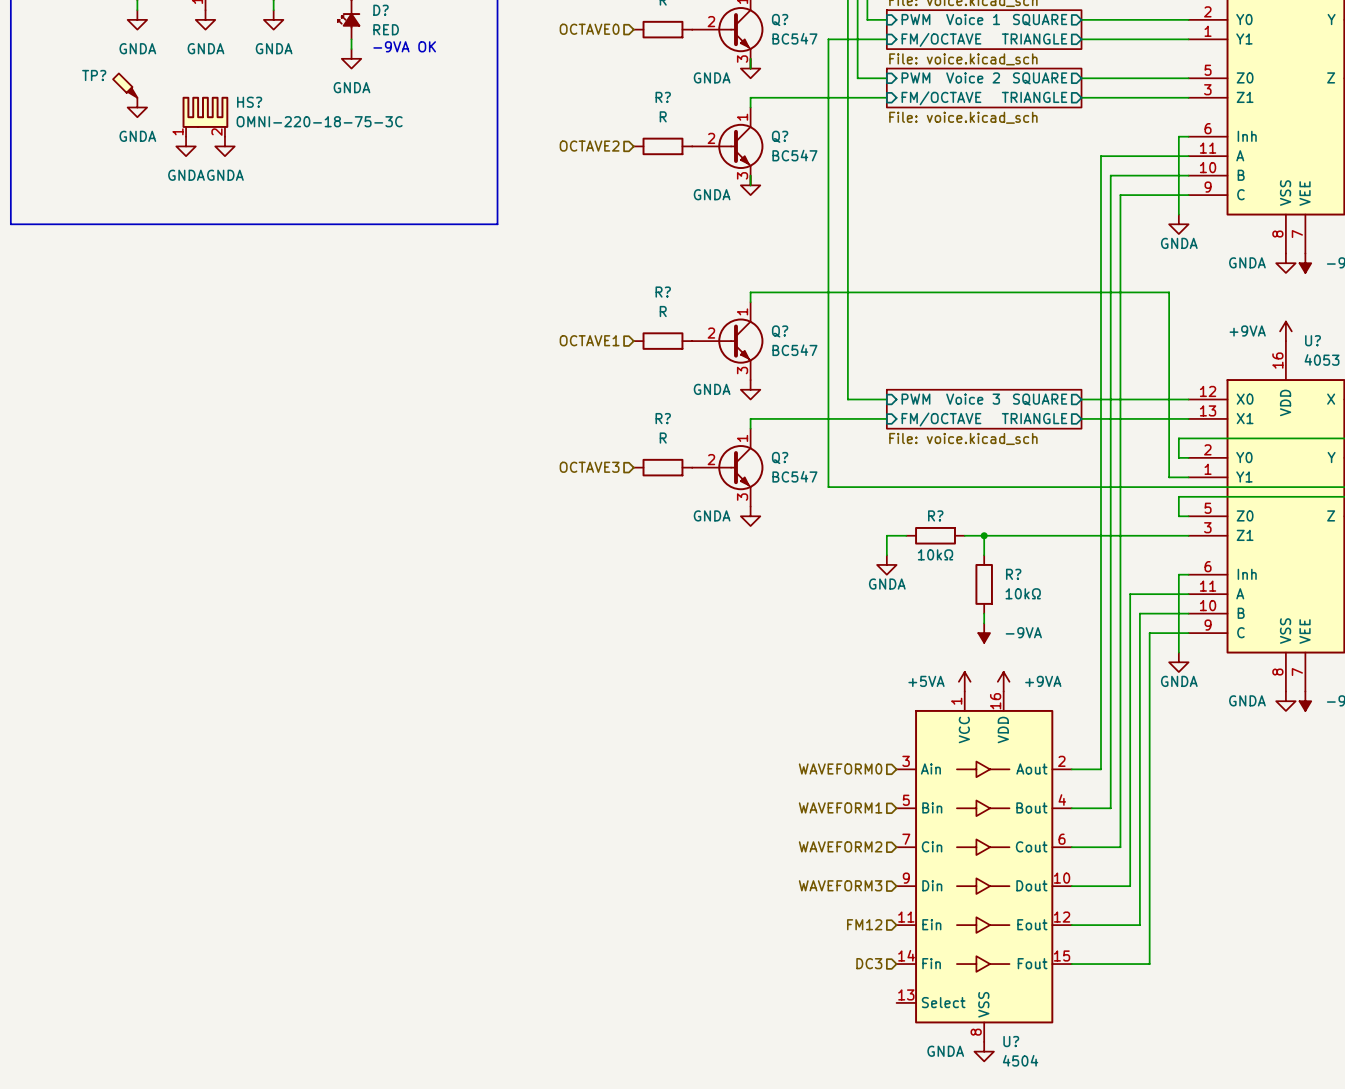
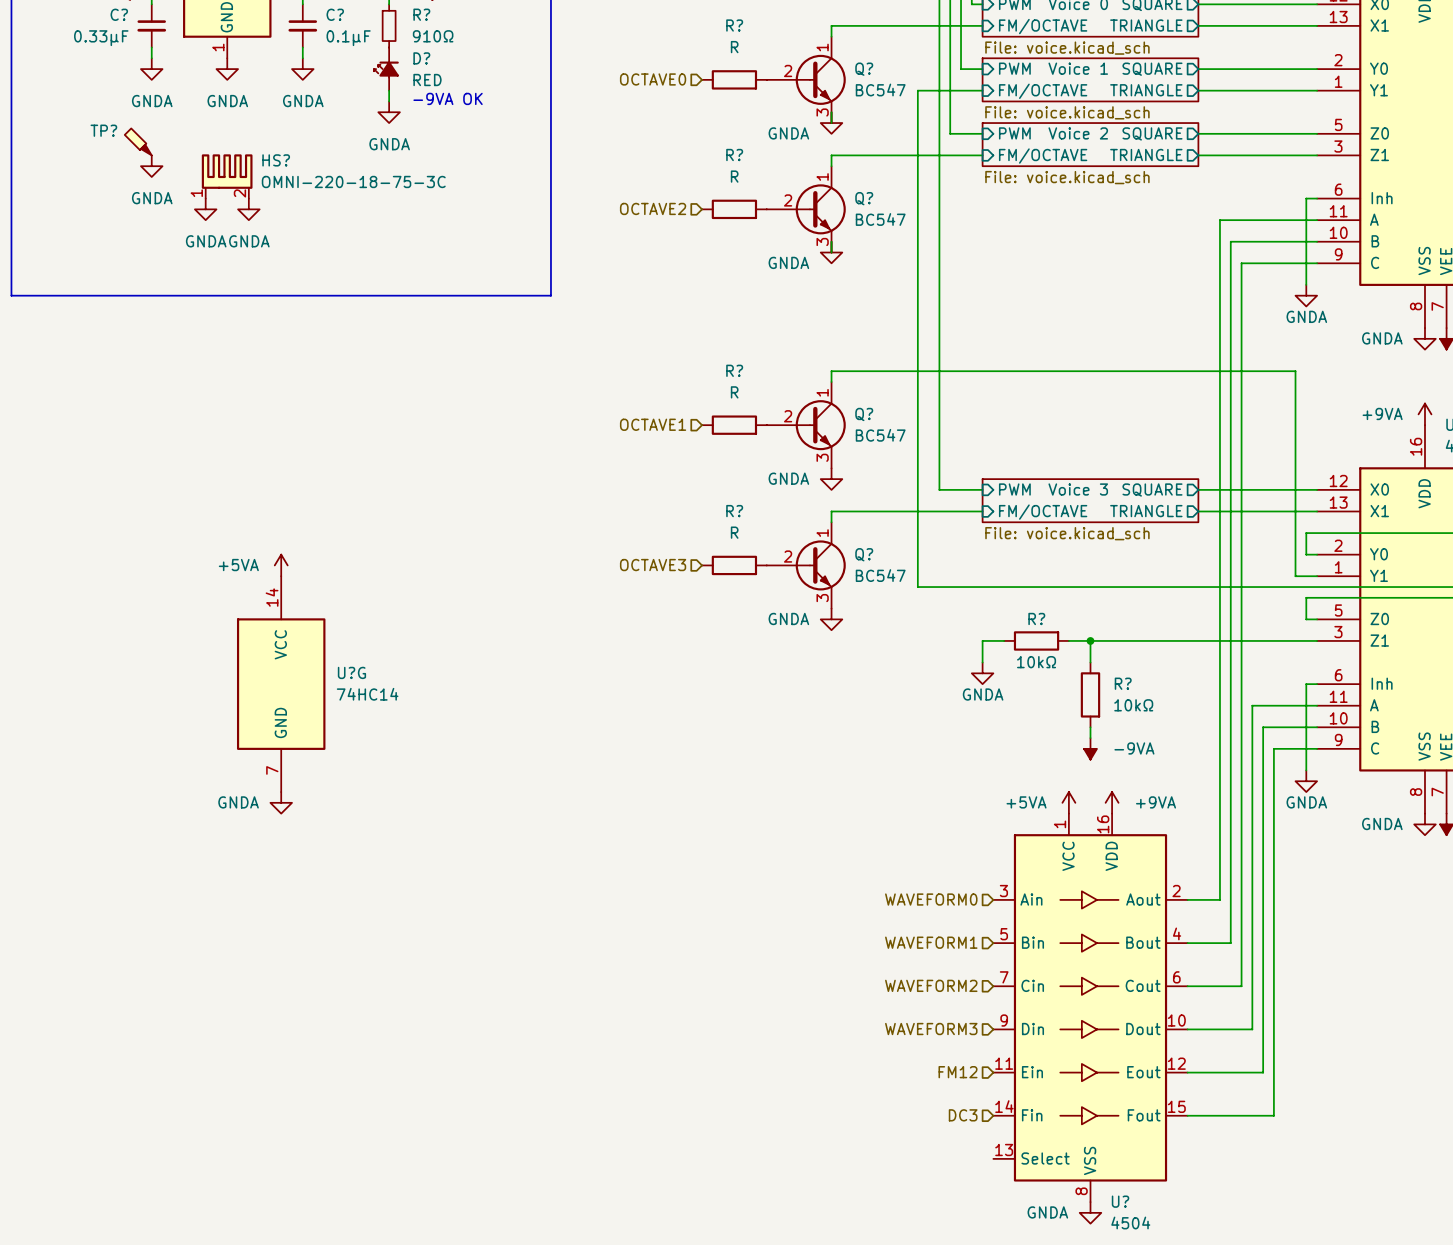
power symbol: none -> +5VA (281, 565)
U?G: none -> 74HC14 (281, 684)
power symbol: none -> GNDA (281, 802)

